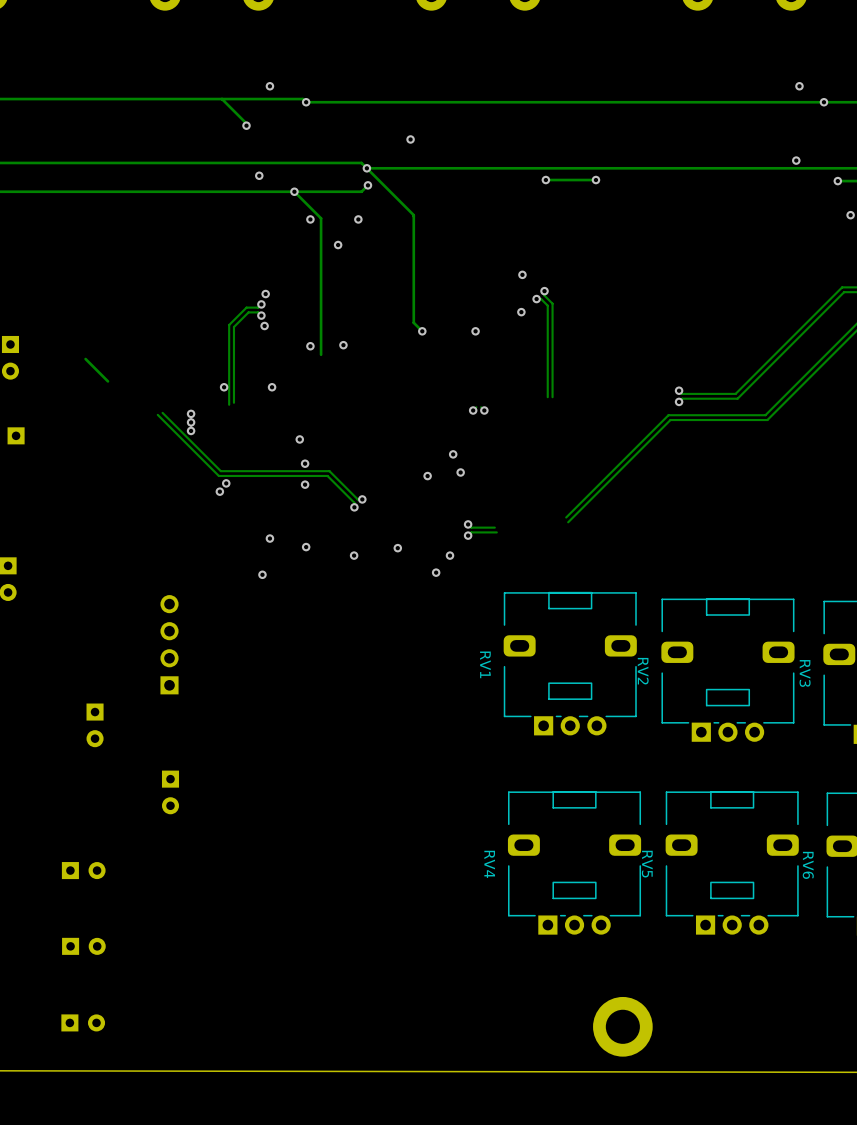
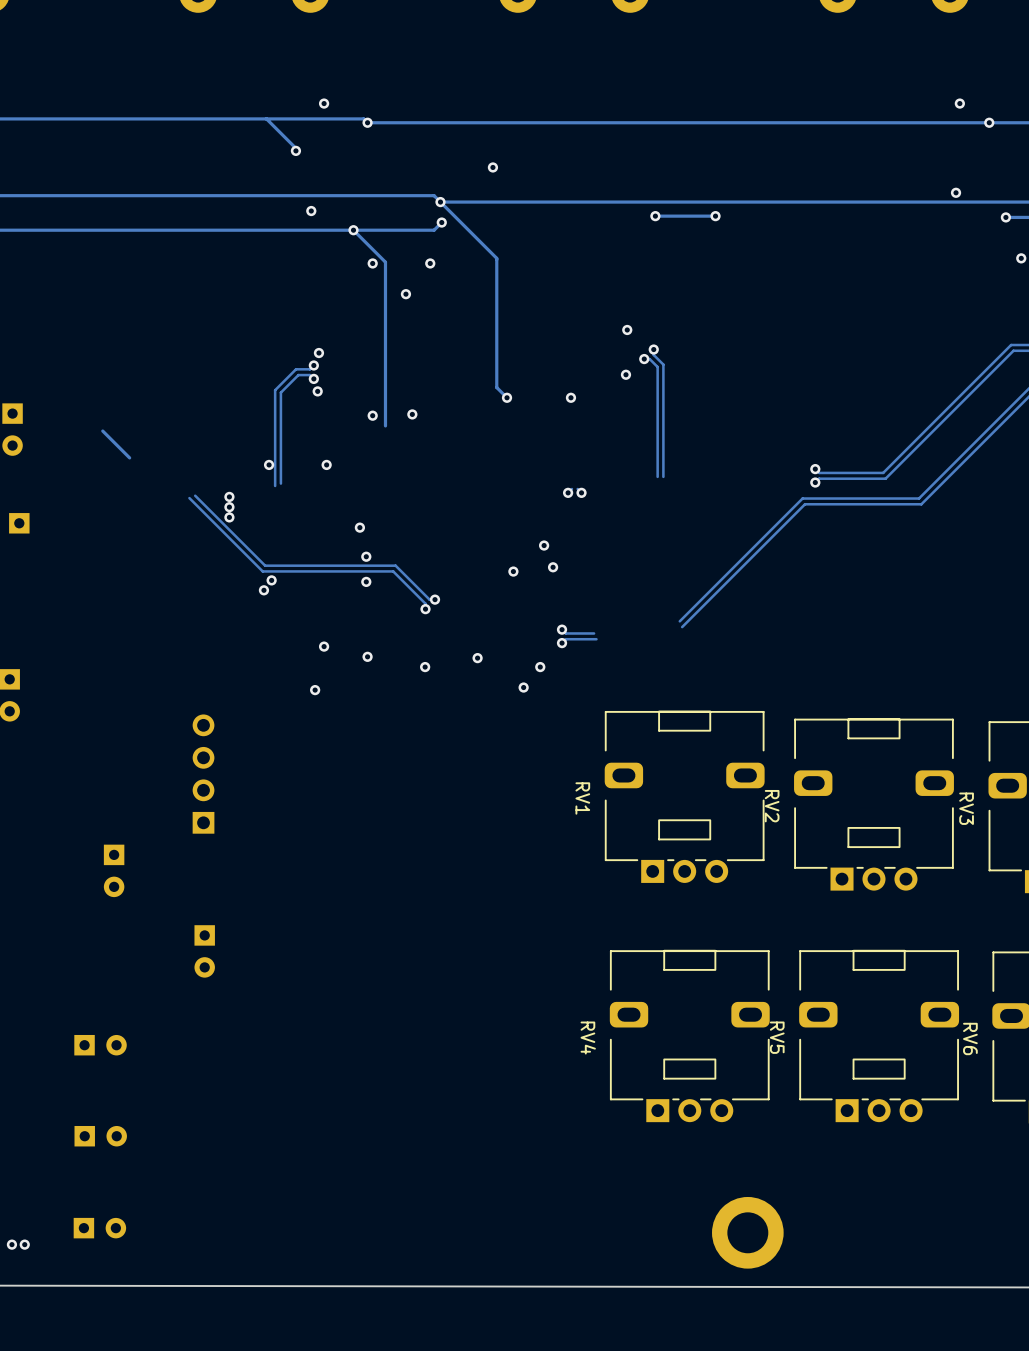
via: none -> (11, 1244)
via: none -> (24, 1244)

